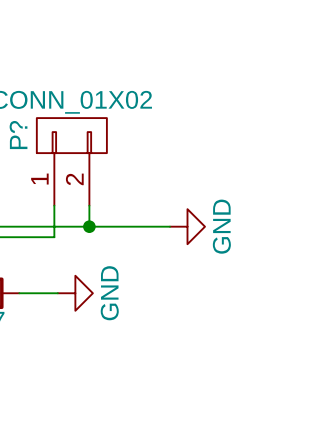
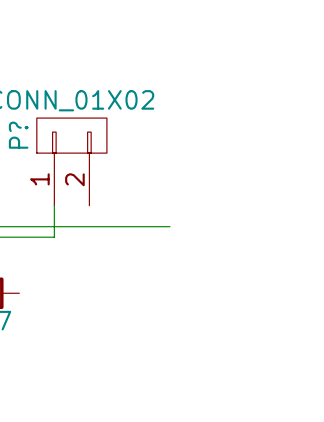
wire: (89, 205) (89, 226) -> none
junction: (89, 226) -> none
power symbol: GND (187, 226) -> none
wire: (19, 293) (57, 293) -> none
power symbol: GND (75, 293) -> none

